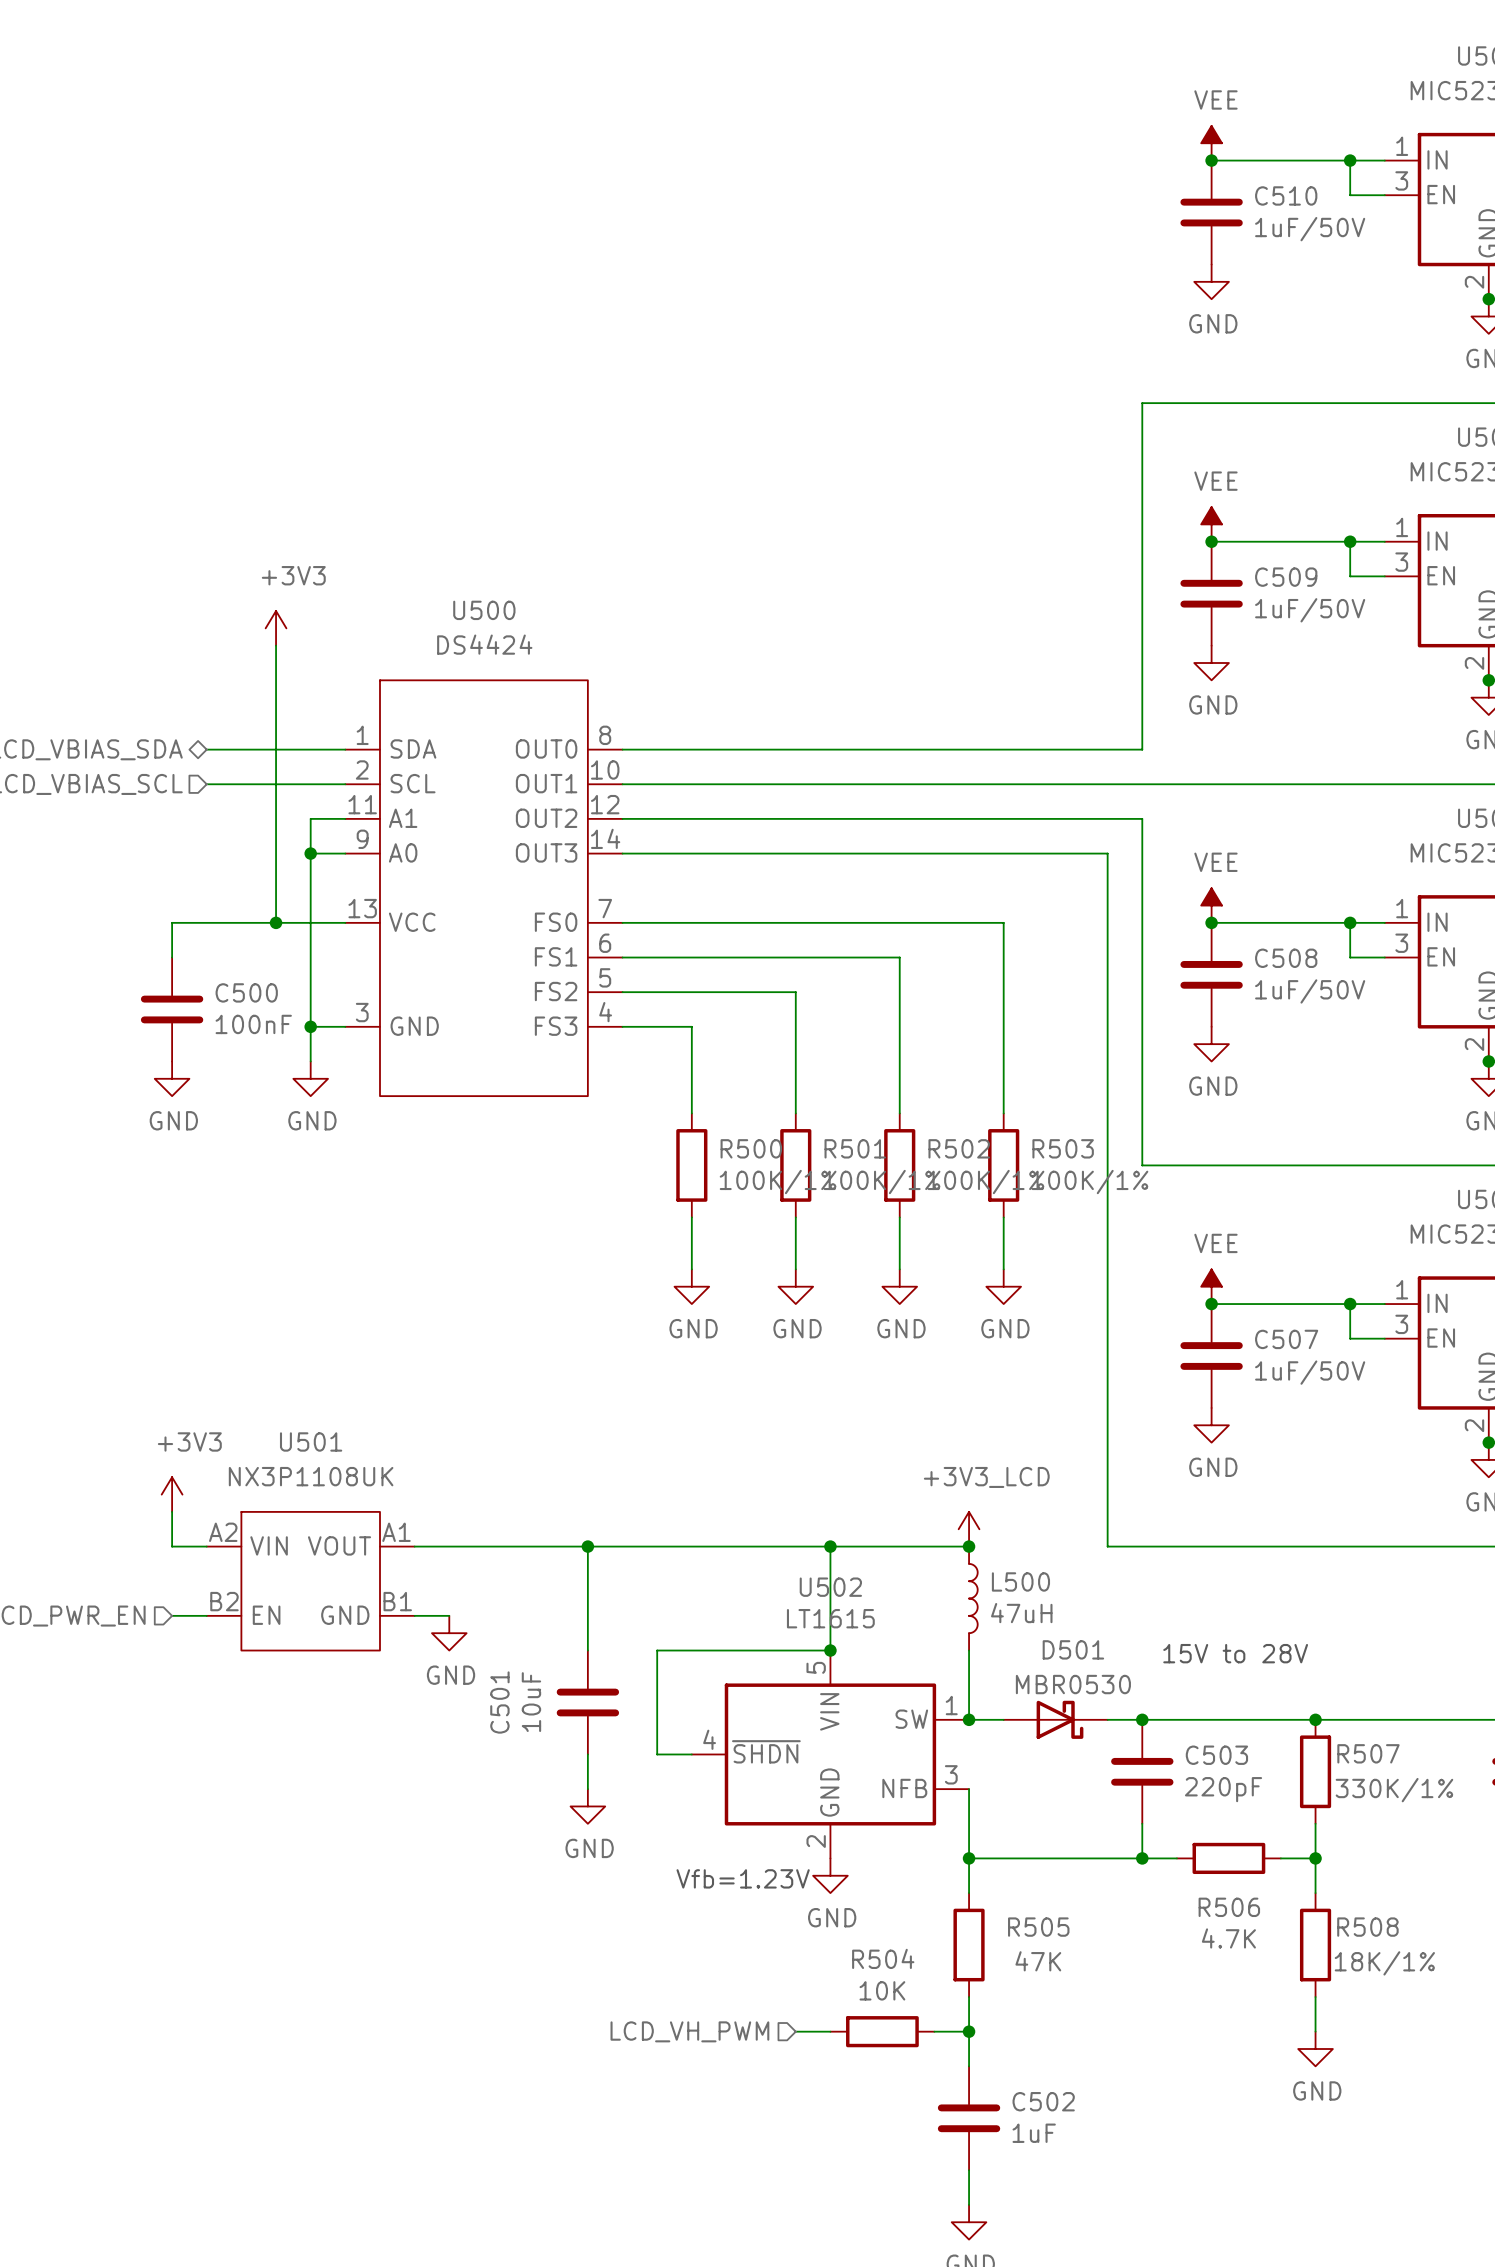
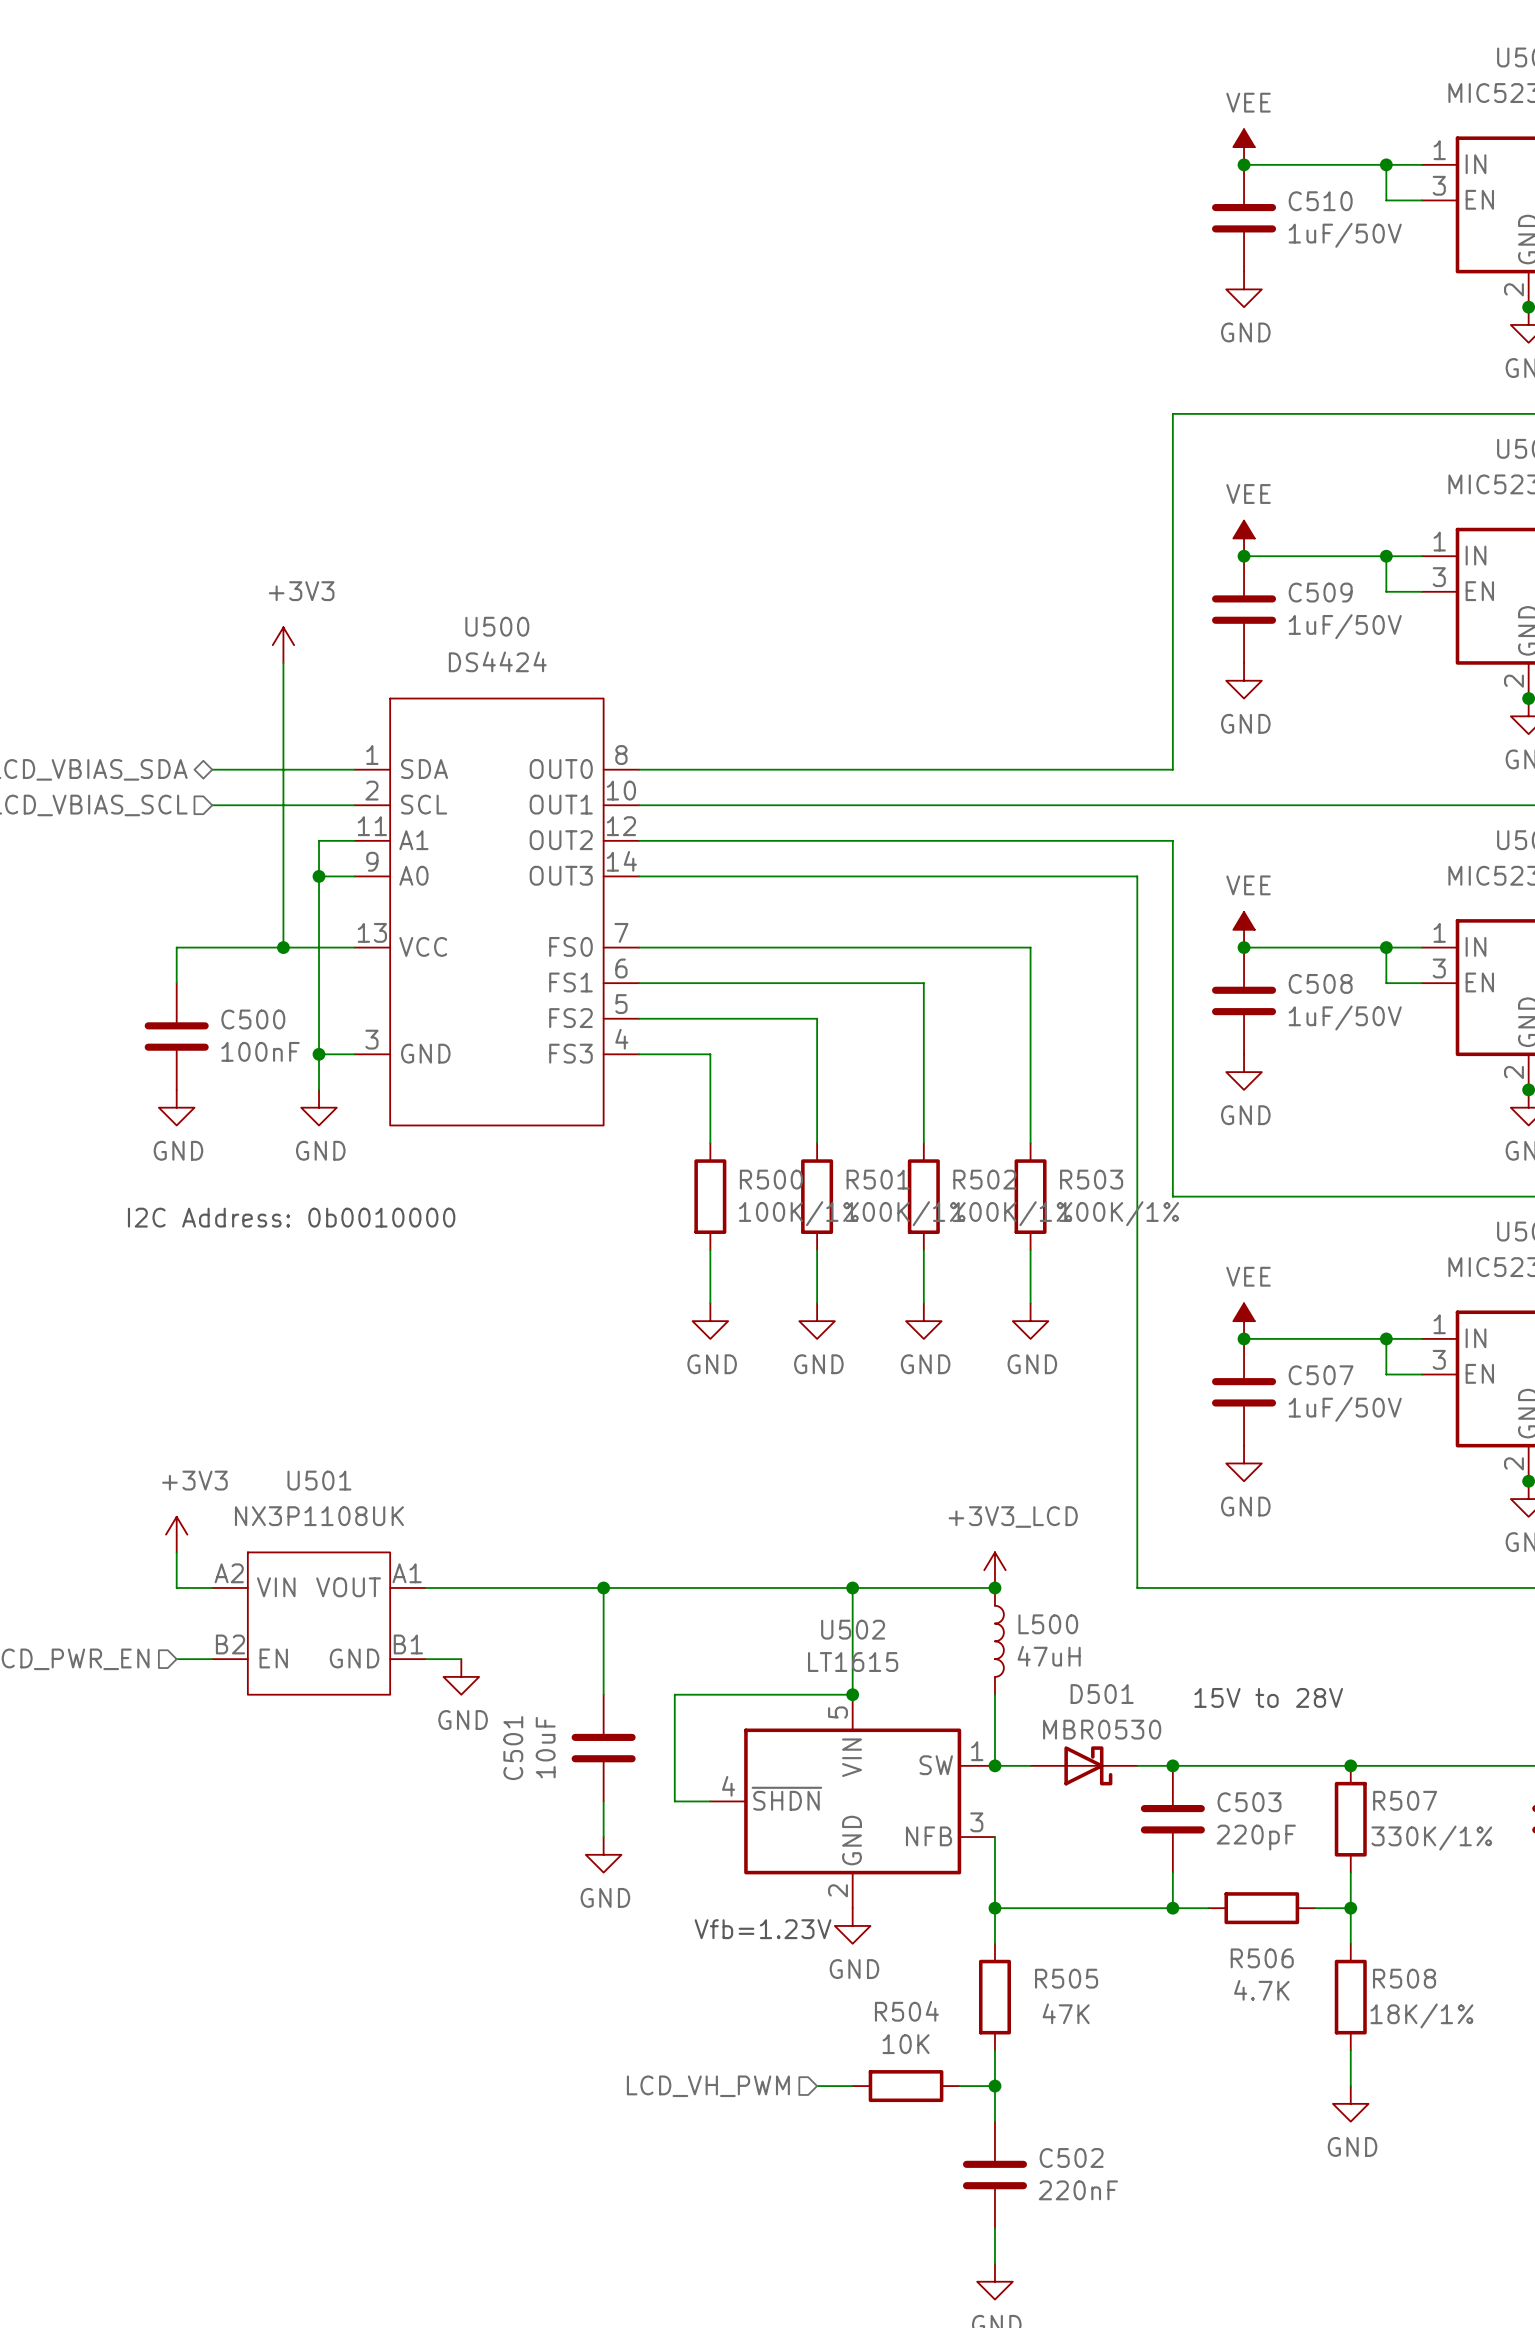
text: none -> I2C Address: 0b0010000 (291, 1217)
C502 value: 1uF (1034, 2133) -> 220nF (1078, 2190)

